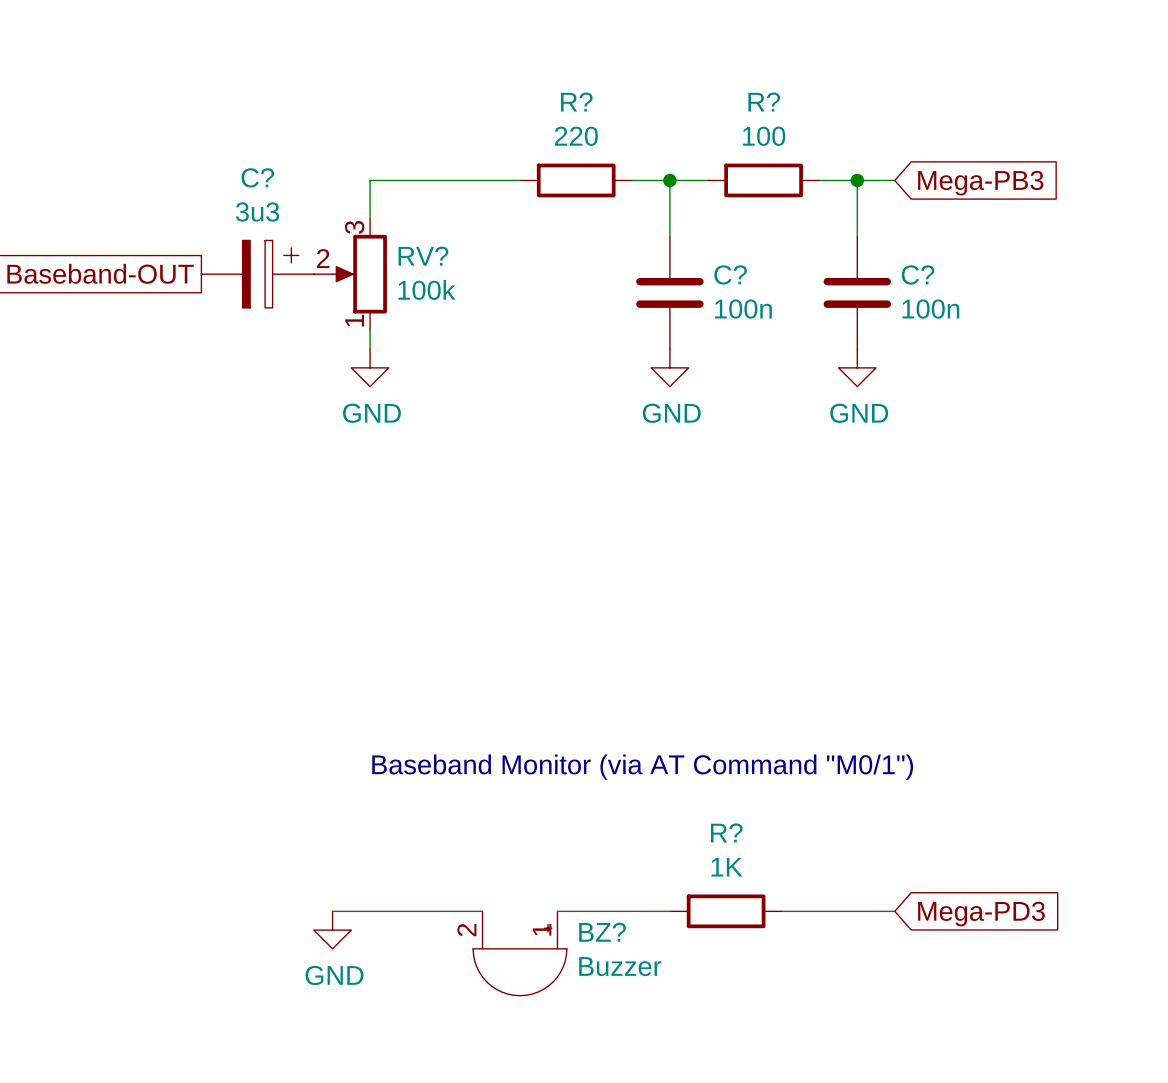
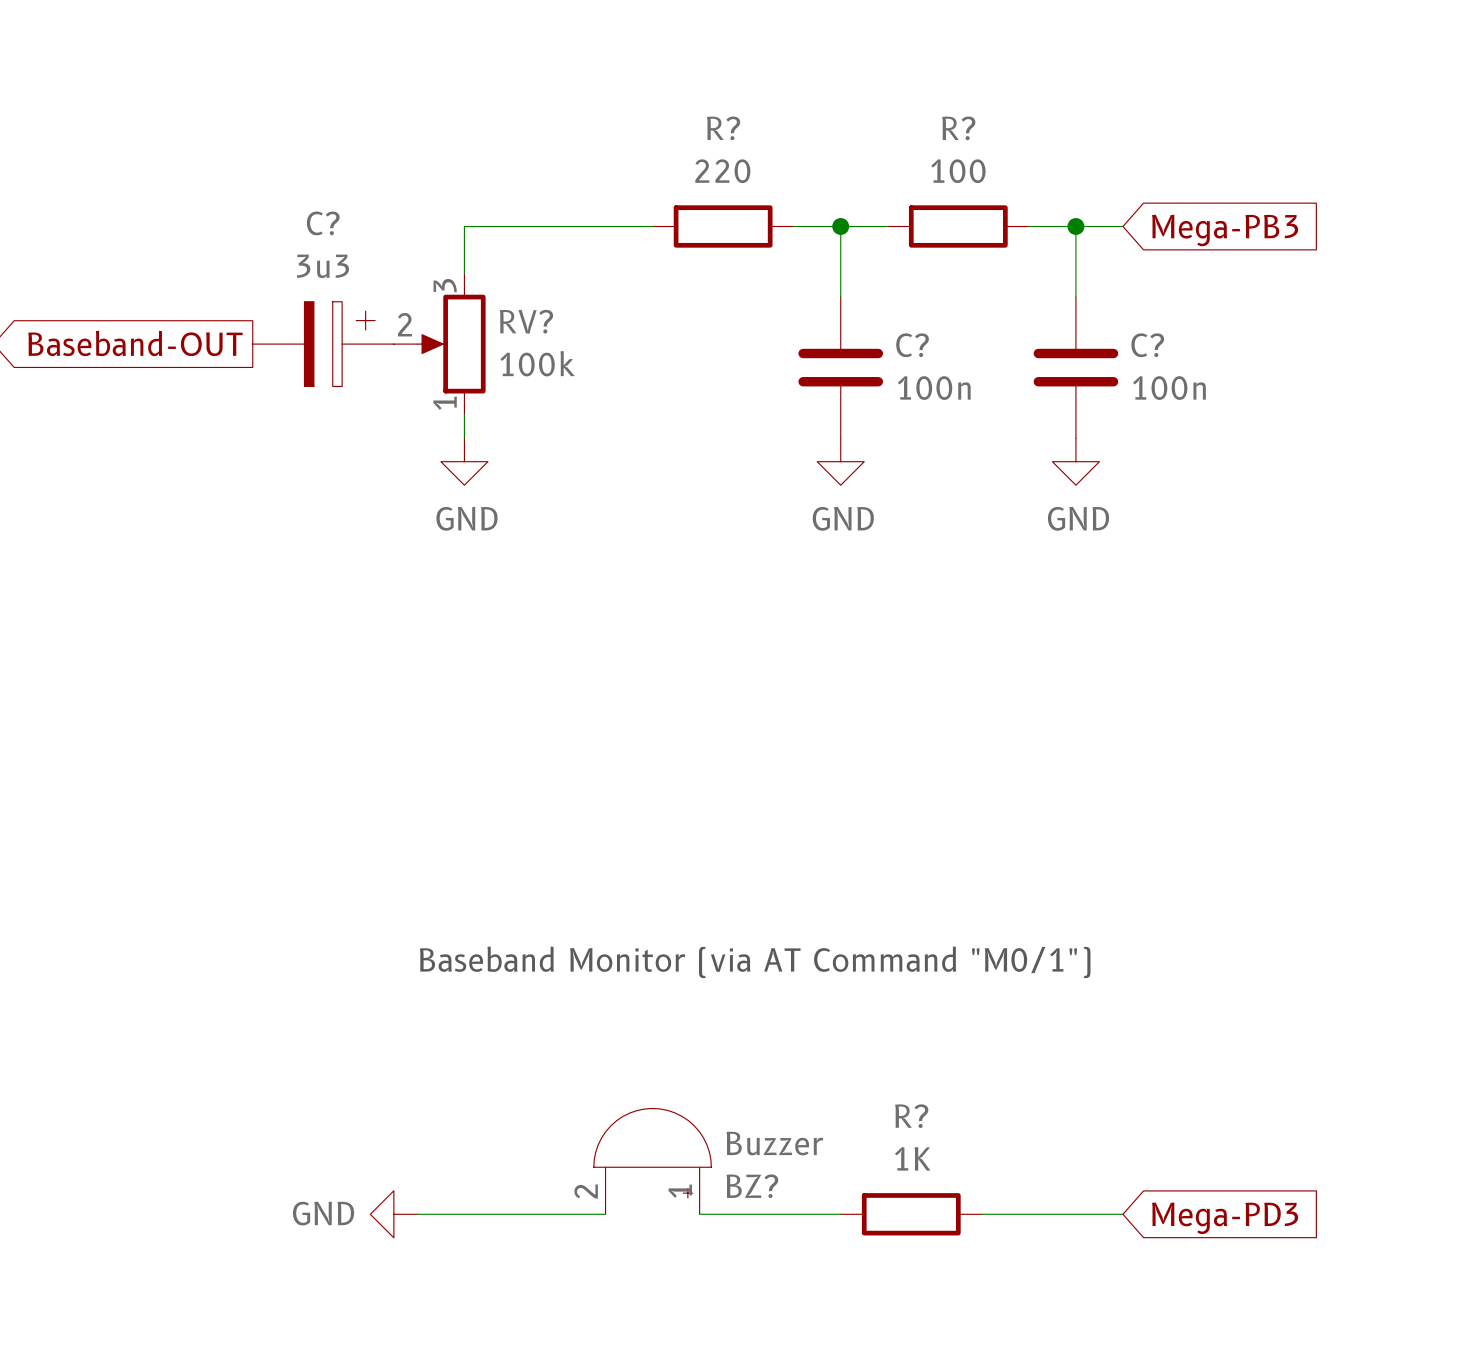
text position: Baseband Monitor (via AT Command "M0/1") (642, 767) -> Baseband Monitor (via AT Command "M0/1") (755, 962)
wire: (332, 911) (482, 911) -> (417, 1214) (605, 1214)
wire: (557, 911) (669, 911) -> (699, 1214) (840, 1214)
R? position: (726, 911) -> (911, 1214)
wire: (782, 911) (894, 911) -> (981, 1214) (1122, 1214)
global label position: Mega-PD3 (981, 914) -> Mega-PD3 (1225, 1218)
BZ?: none -> Buzzer (652, 1161)
power symbol rotation: 0° (332, 930) -> 90° clockwise (393, 1214)
power symbol position: GND (332, 930) -> GND (393, 1214)
BZ?: Buzzer (519, 953) -> none

